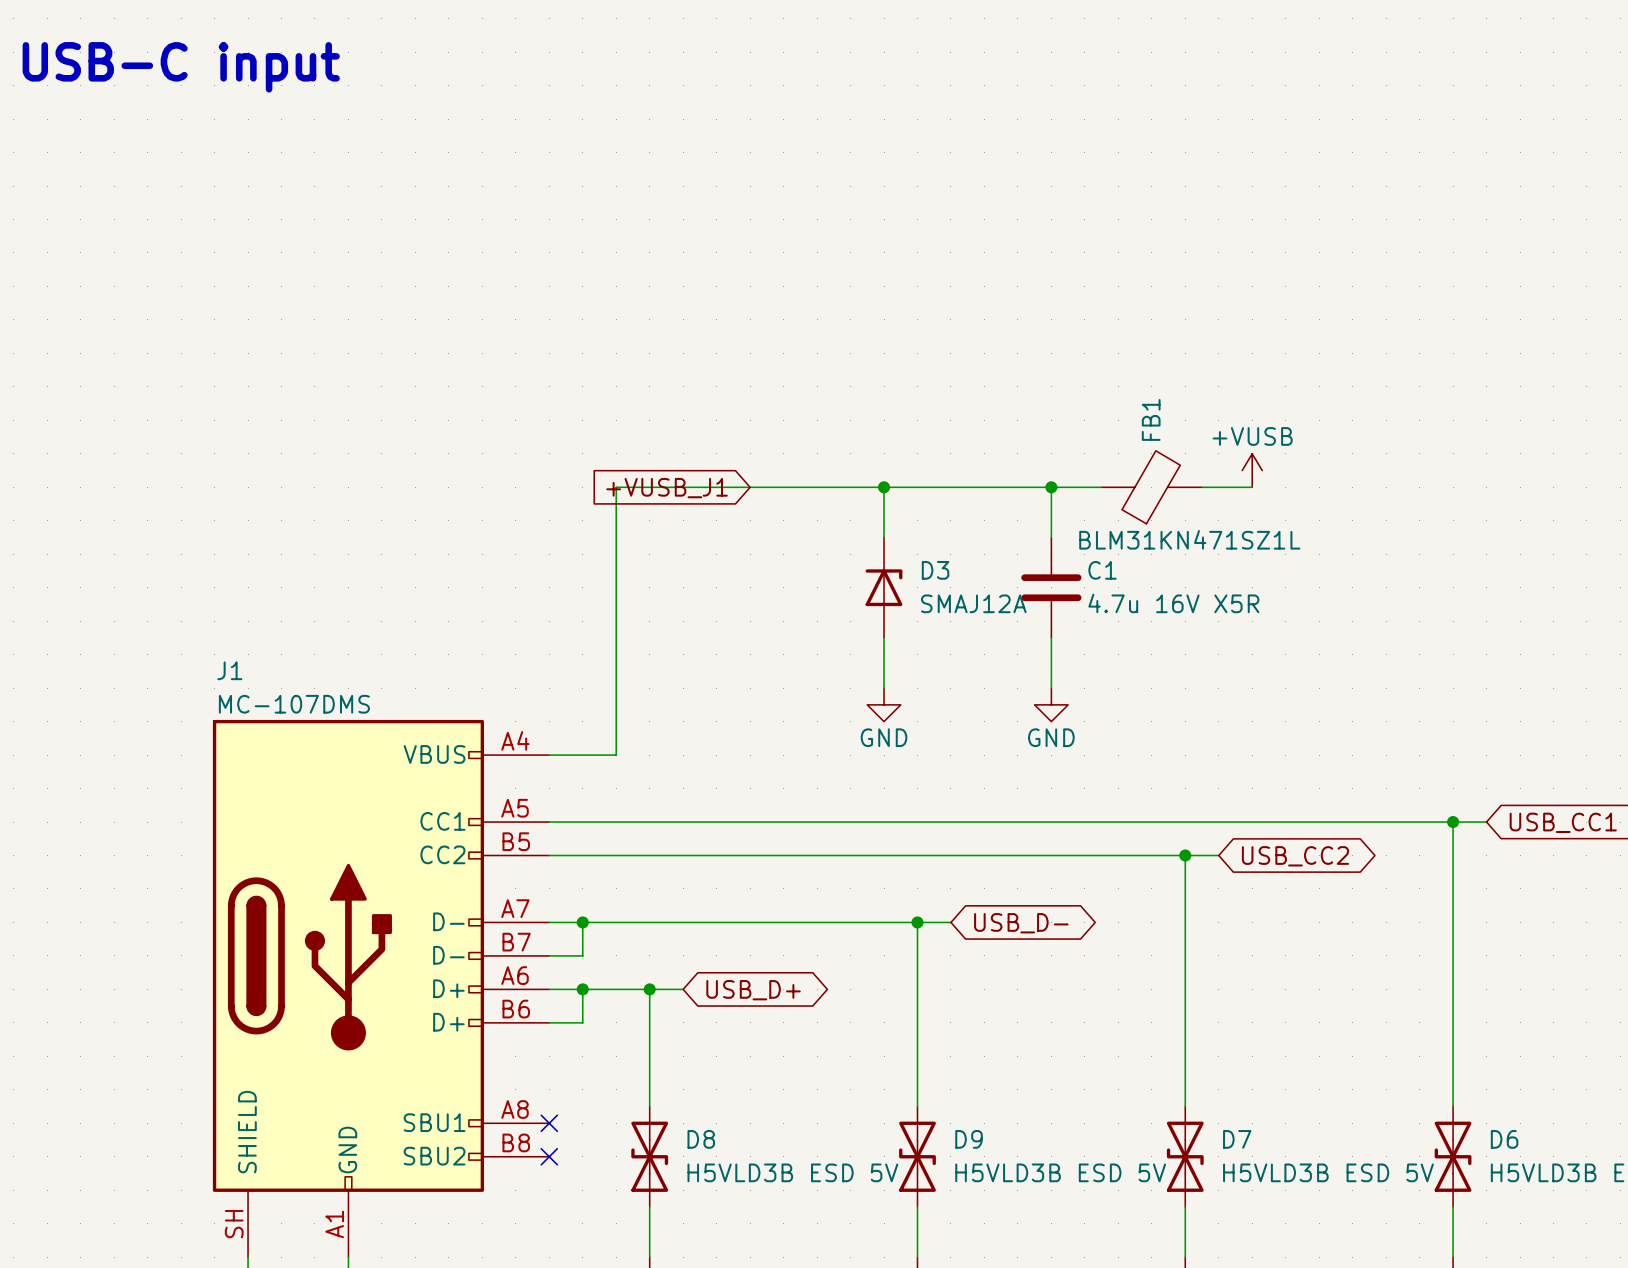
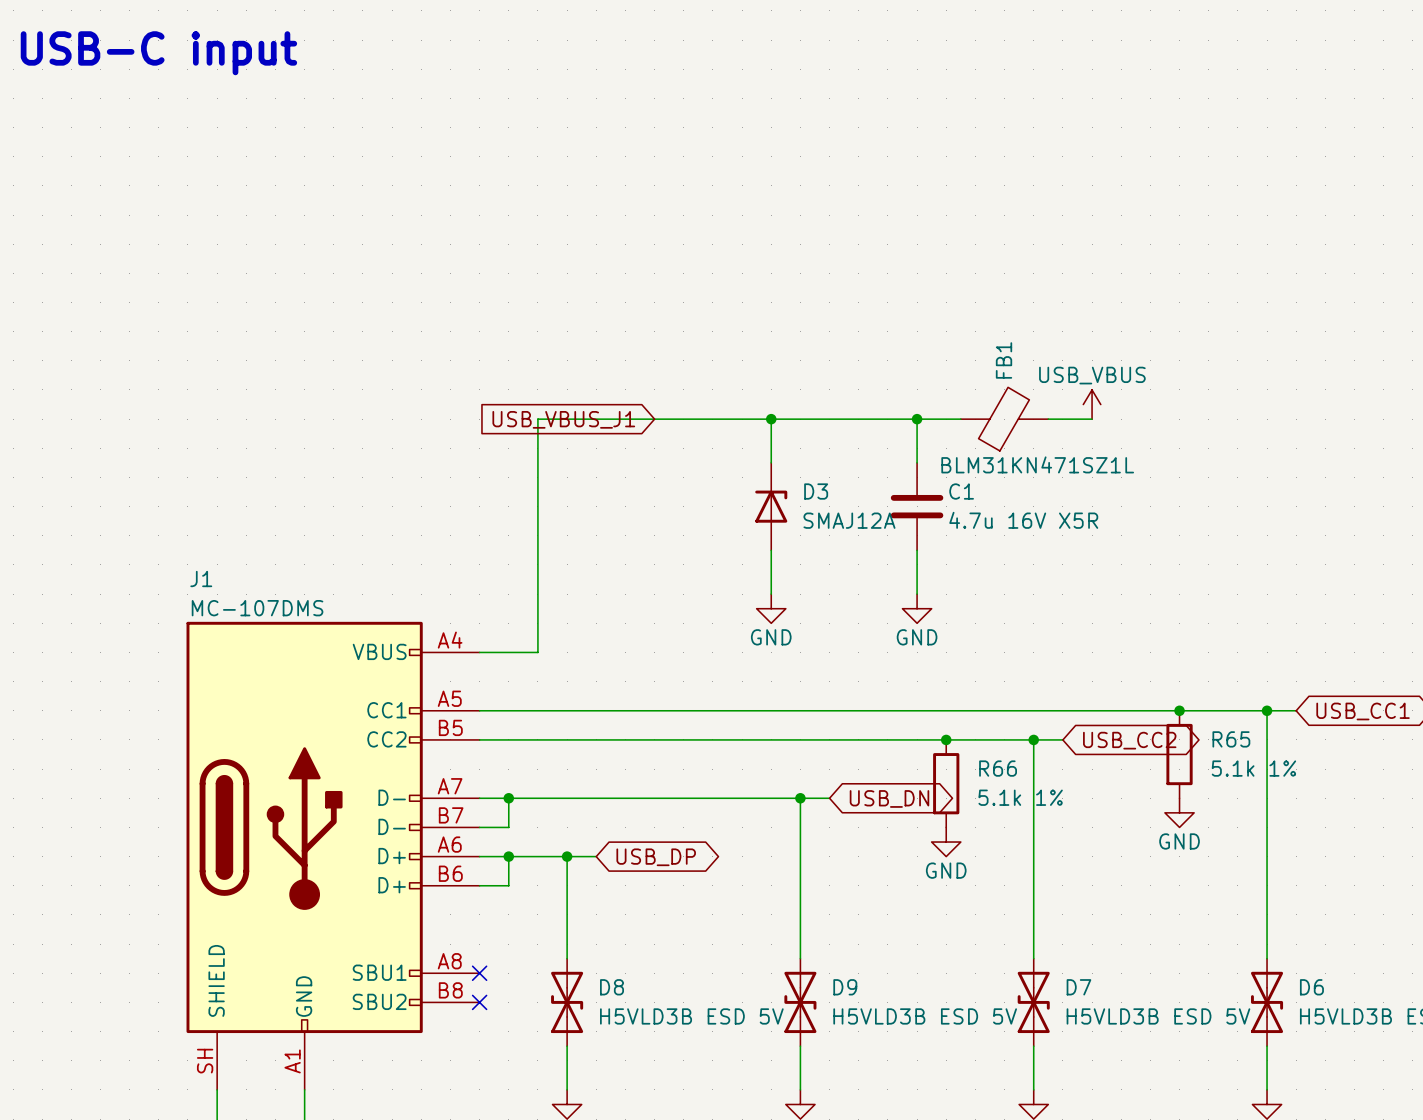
power symbol: +VUSB (1252, 470) -> USB_VBUS (1092, 404)
global label: +VUSB_J1 (667, 488) -> USB_VBUS_J1 (563, 419)
junction: none -> (1179, 710)
junction: none -> (946, 739)
R65: none -> 5.1k 1% (1179, 754)
R66: none -> 5.1k 1% (946, 783)
global label: USB_D- (1021, 923) -> USB_DN (889, 798)
power symbol: none -> GND (1179, 812)
power symbol: none -> GND (946, 842)
global label: USB_D+ (753, 990) -> USB_DP (656, 857)

